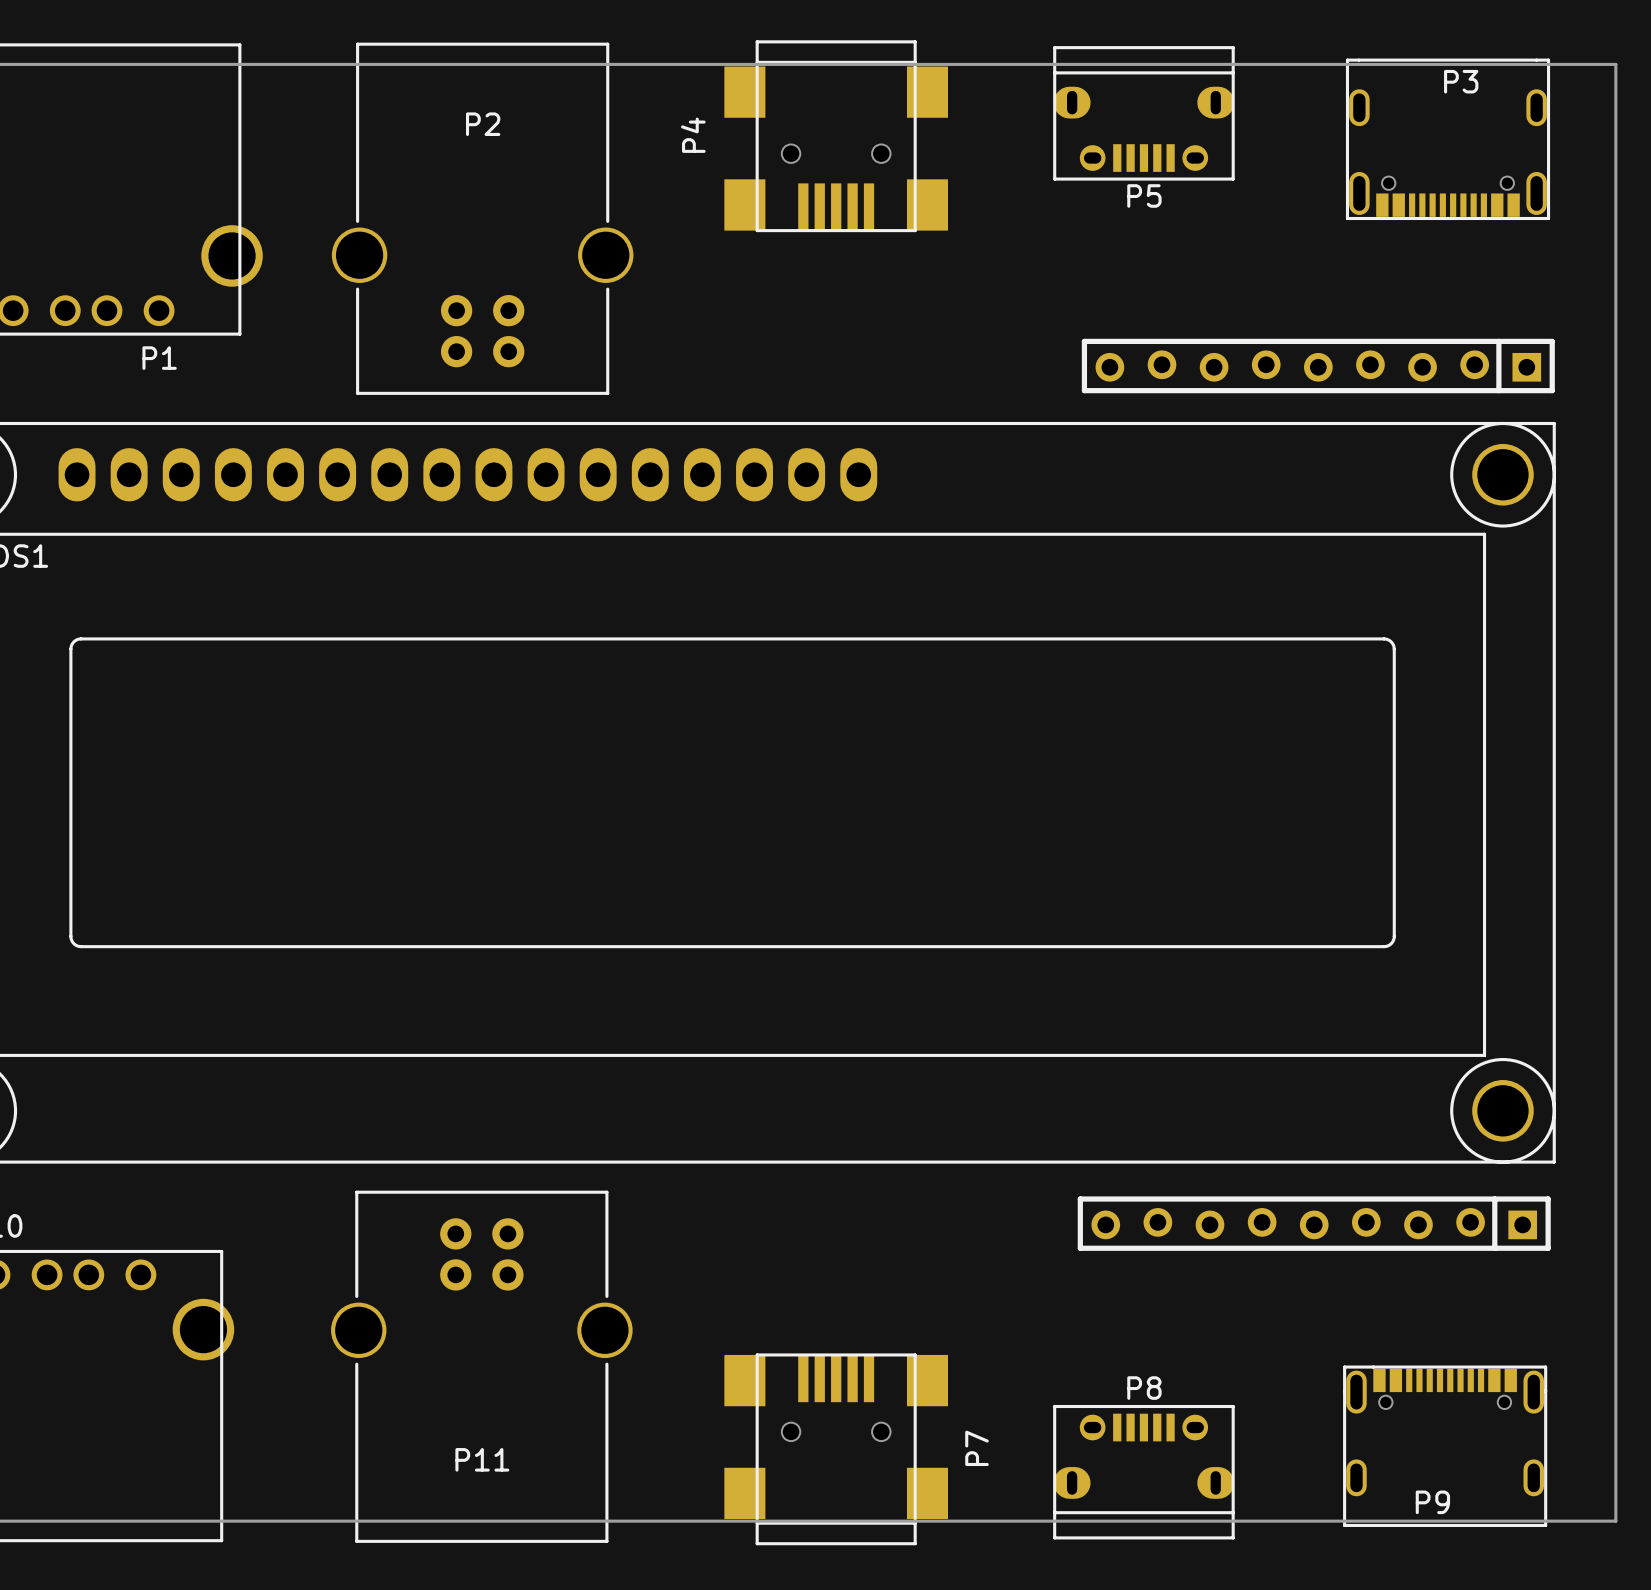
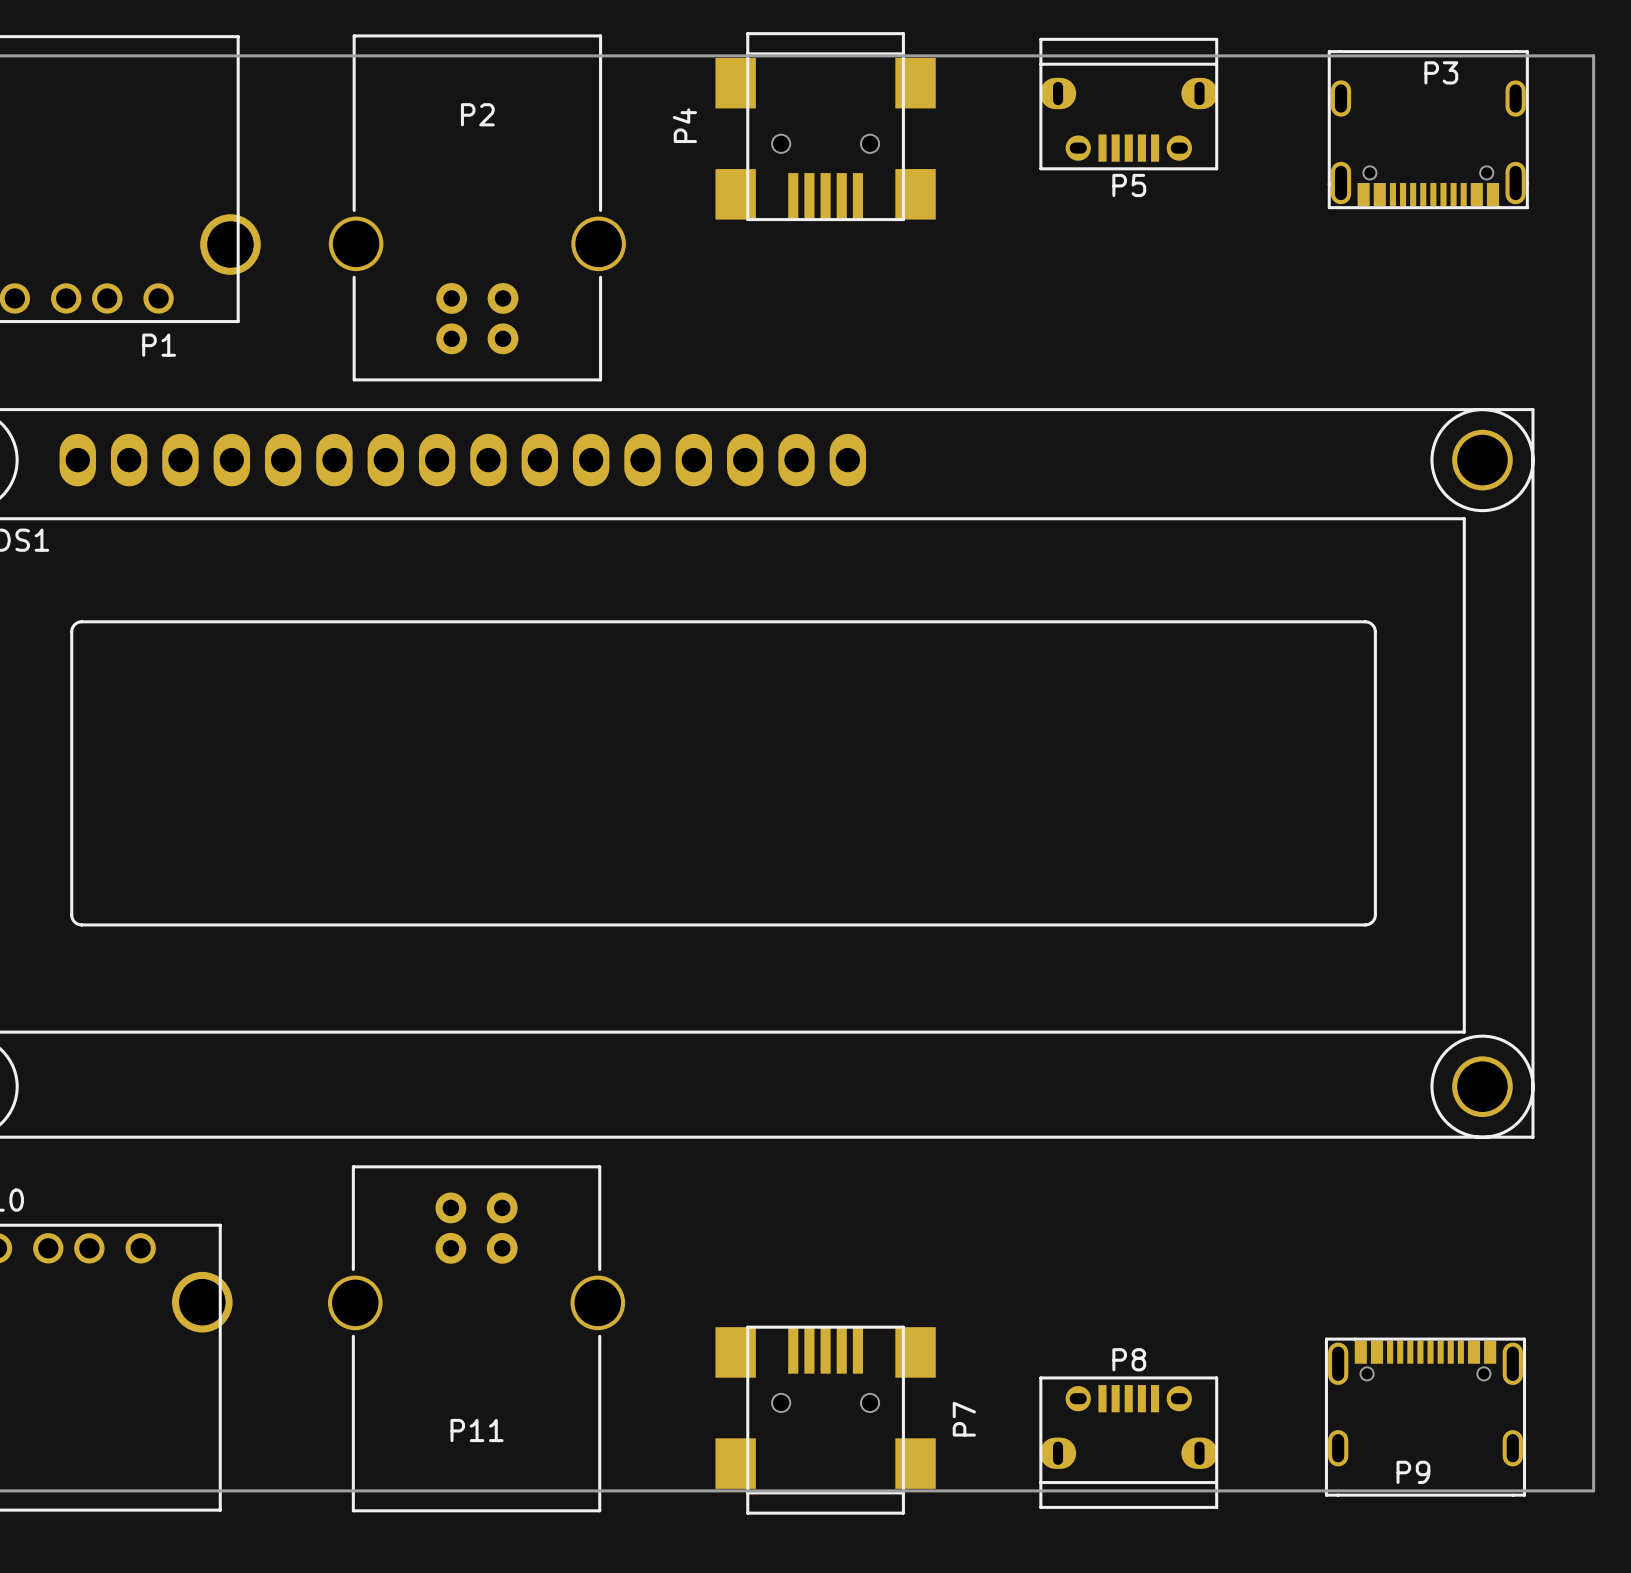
part: (1318, 366) -> none
part: (1314, 1223) -> none

